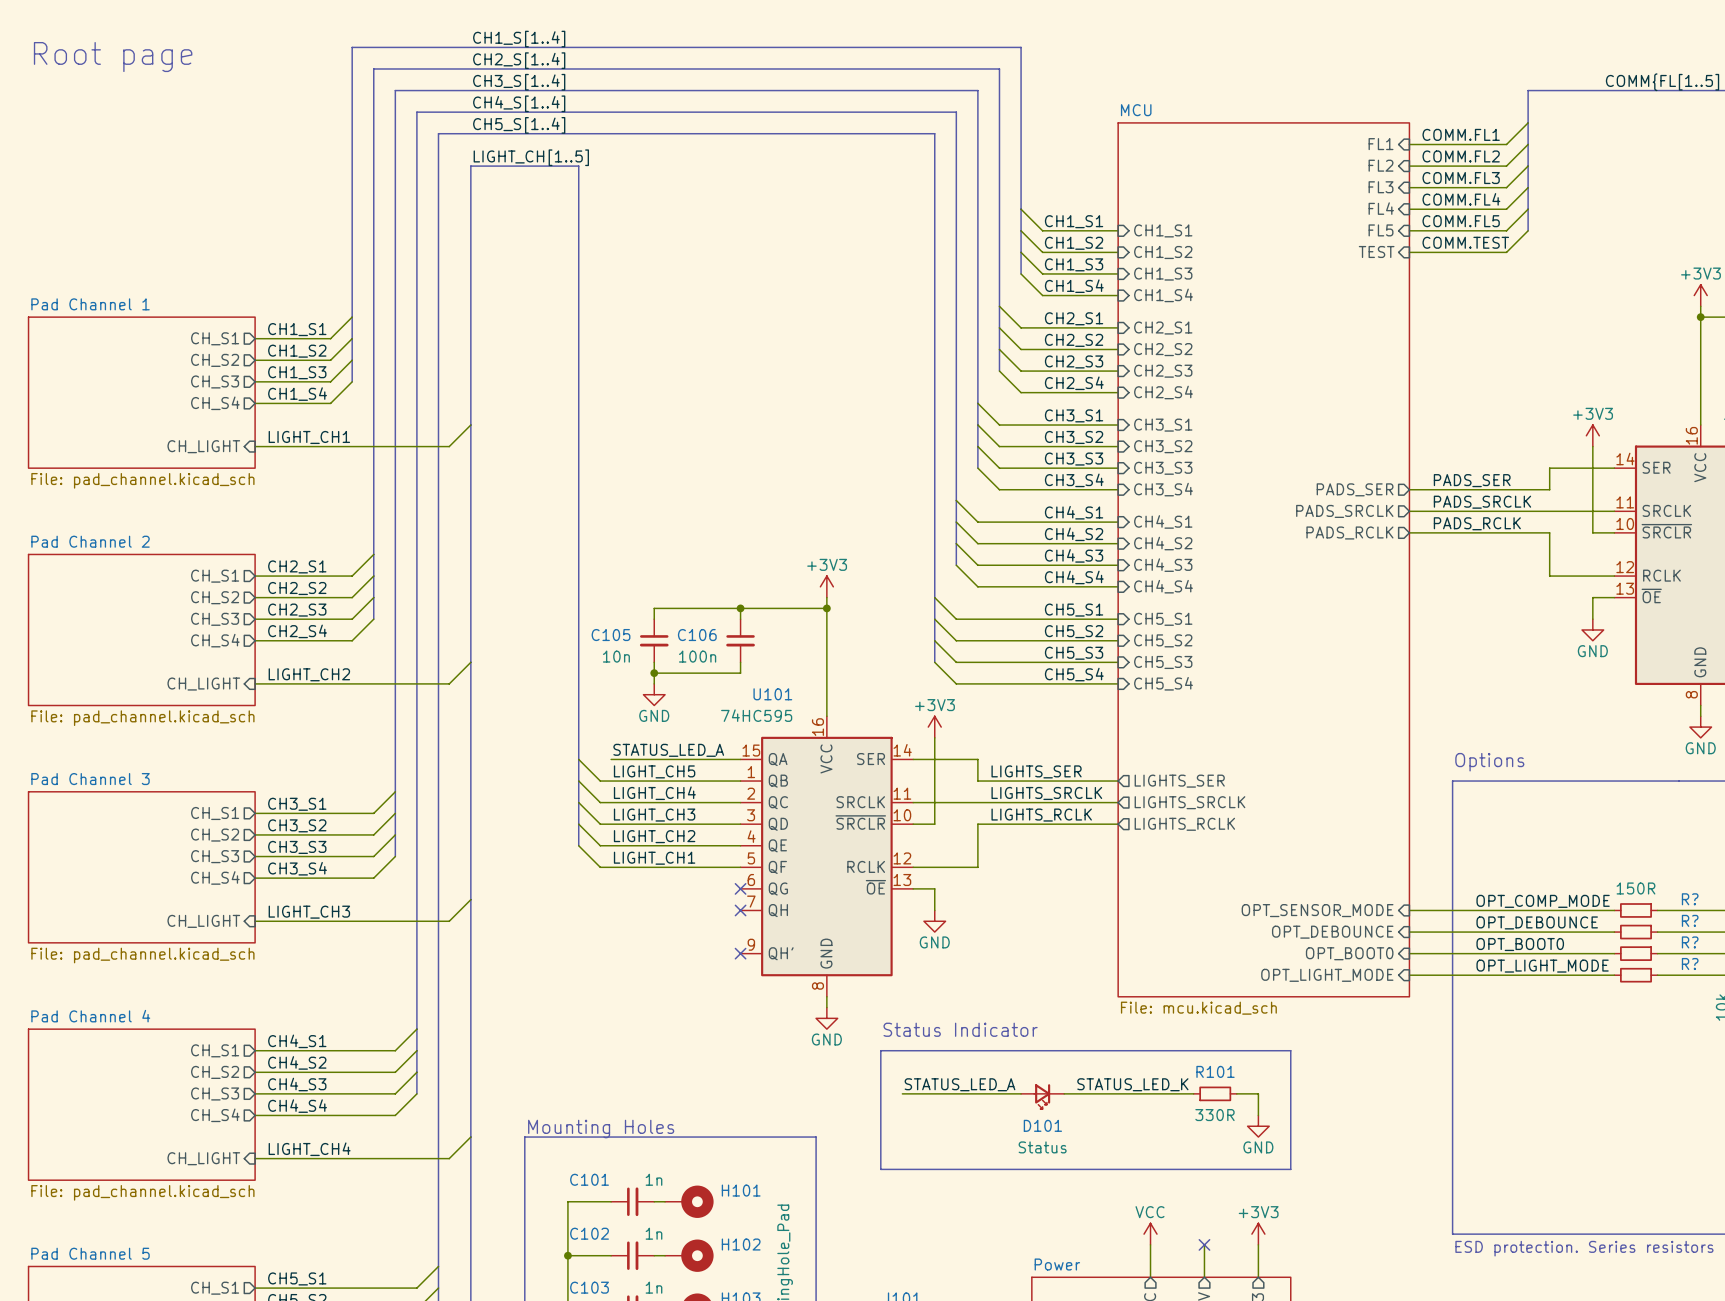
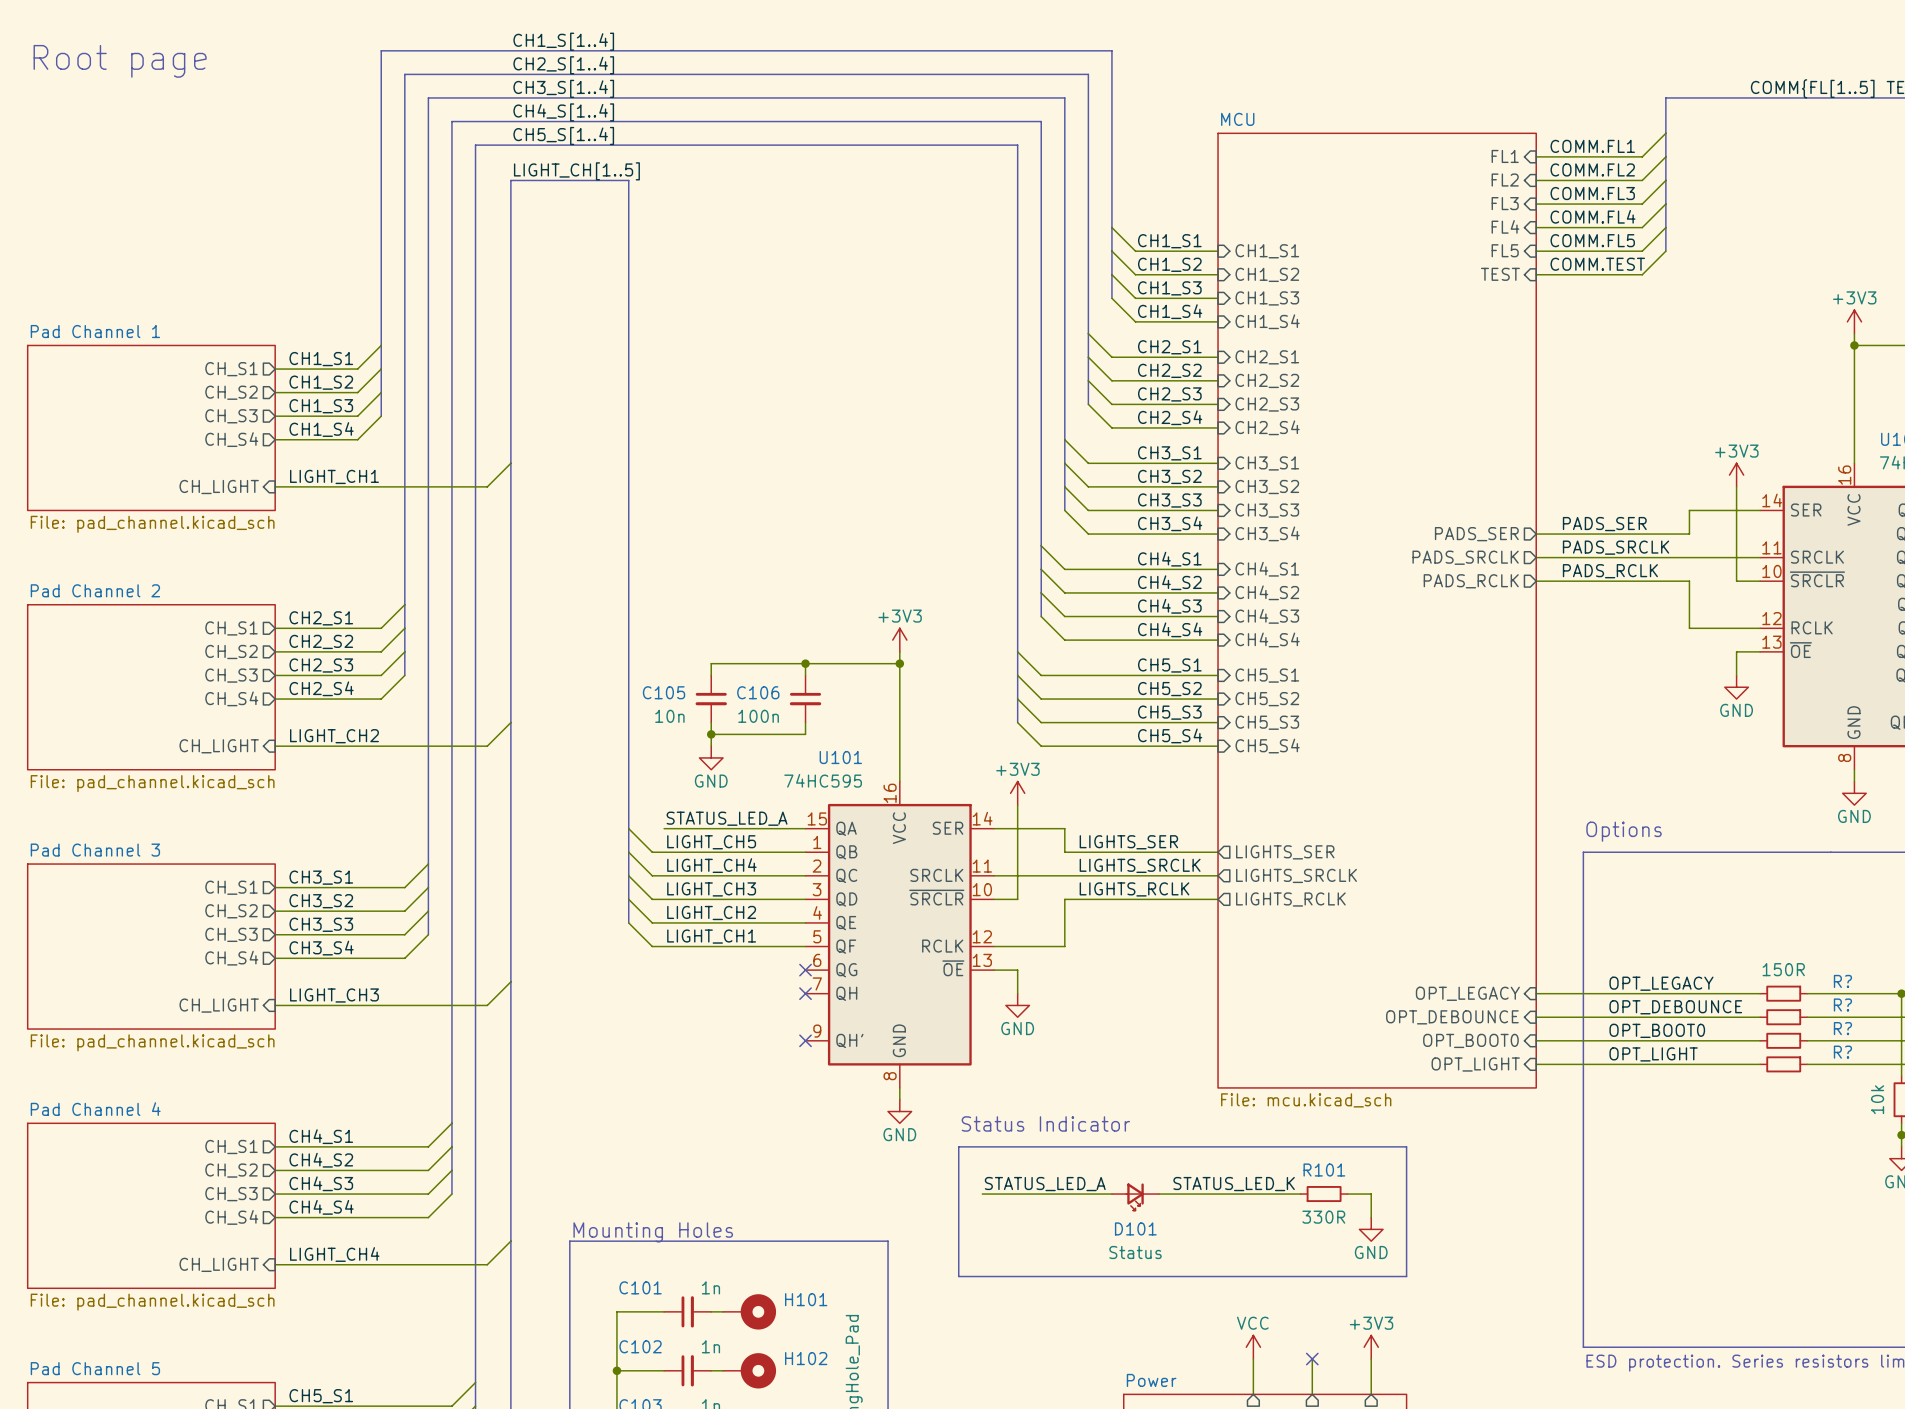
label: OPT_COMP_MODE (1543, 901) -> OPT_LEGACY (1661, 983)
sheet pin: OPT_SENSOR_MODE (1317, 910) -> OPT_LEGACY (1467, 993)
label: OPT_LIGHT_MODE (1542, 966) -> OPT_LIGHT (1653, 1054)
sheet pin: OPT_LIGHT_MODE (1327, 975) -> OPT_LIGHT (1475, 1064)

